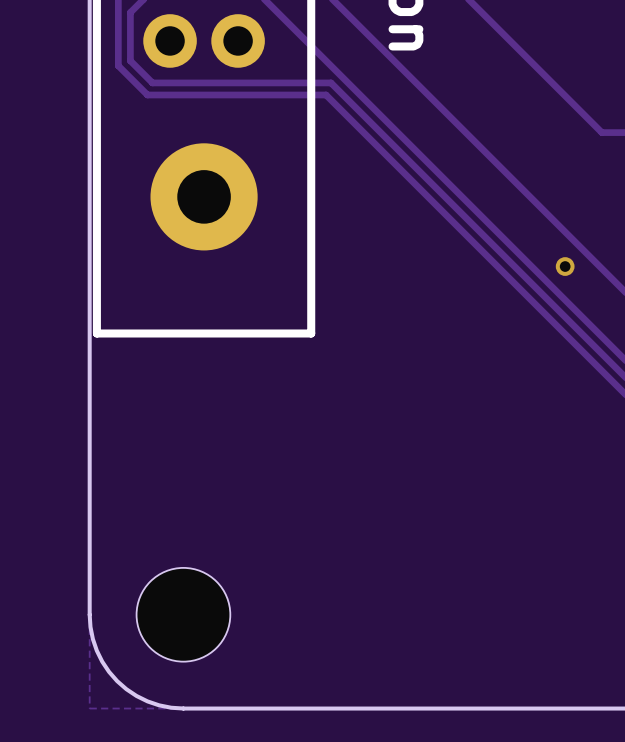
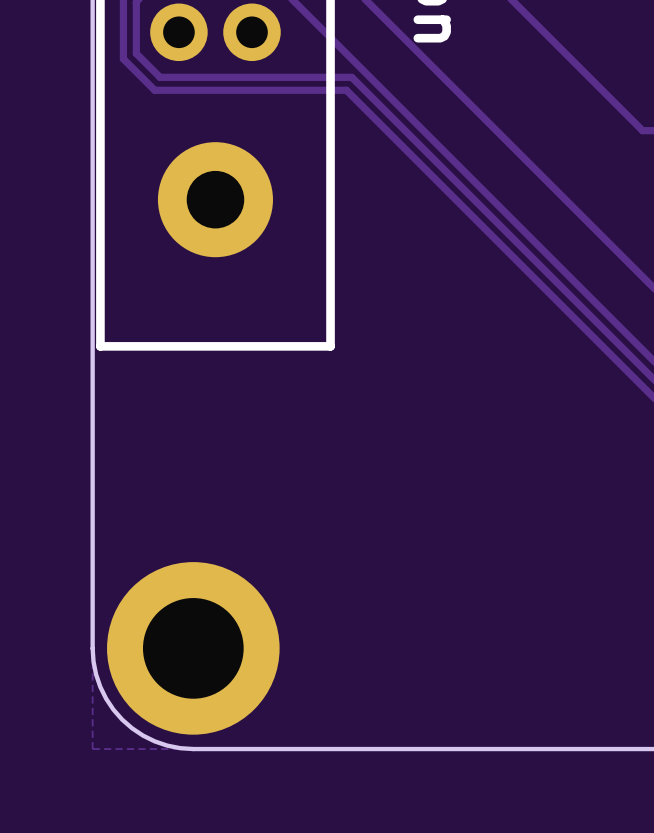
via: (565, 266) -> none
part footprint: [136, 567, 231, 662] -> [107, 562, 280, 735]

